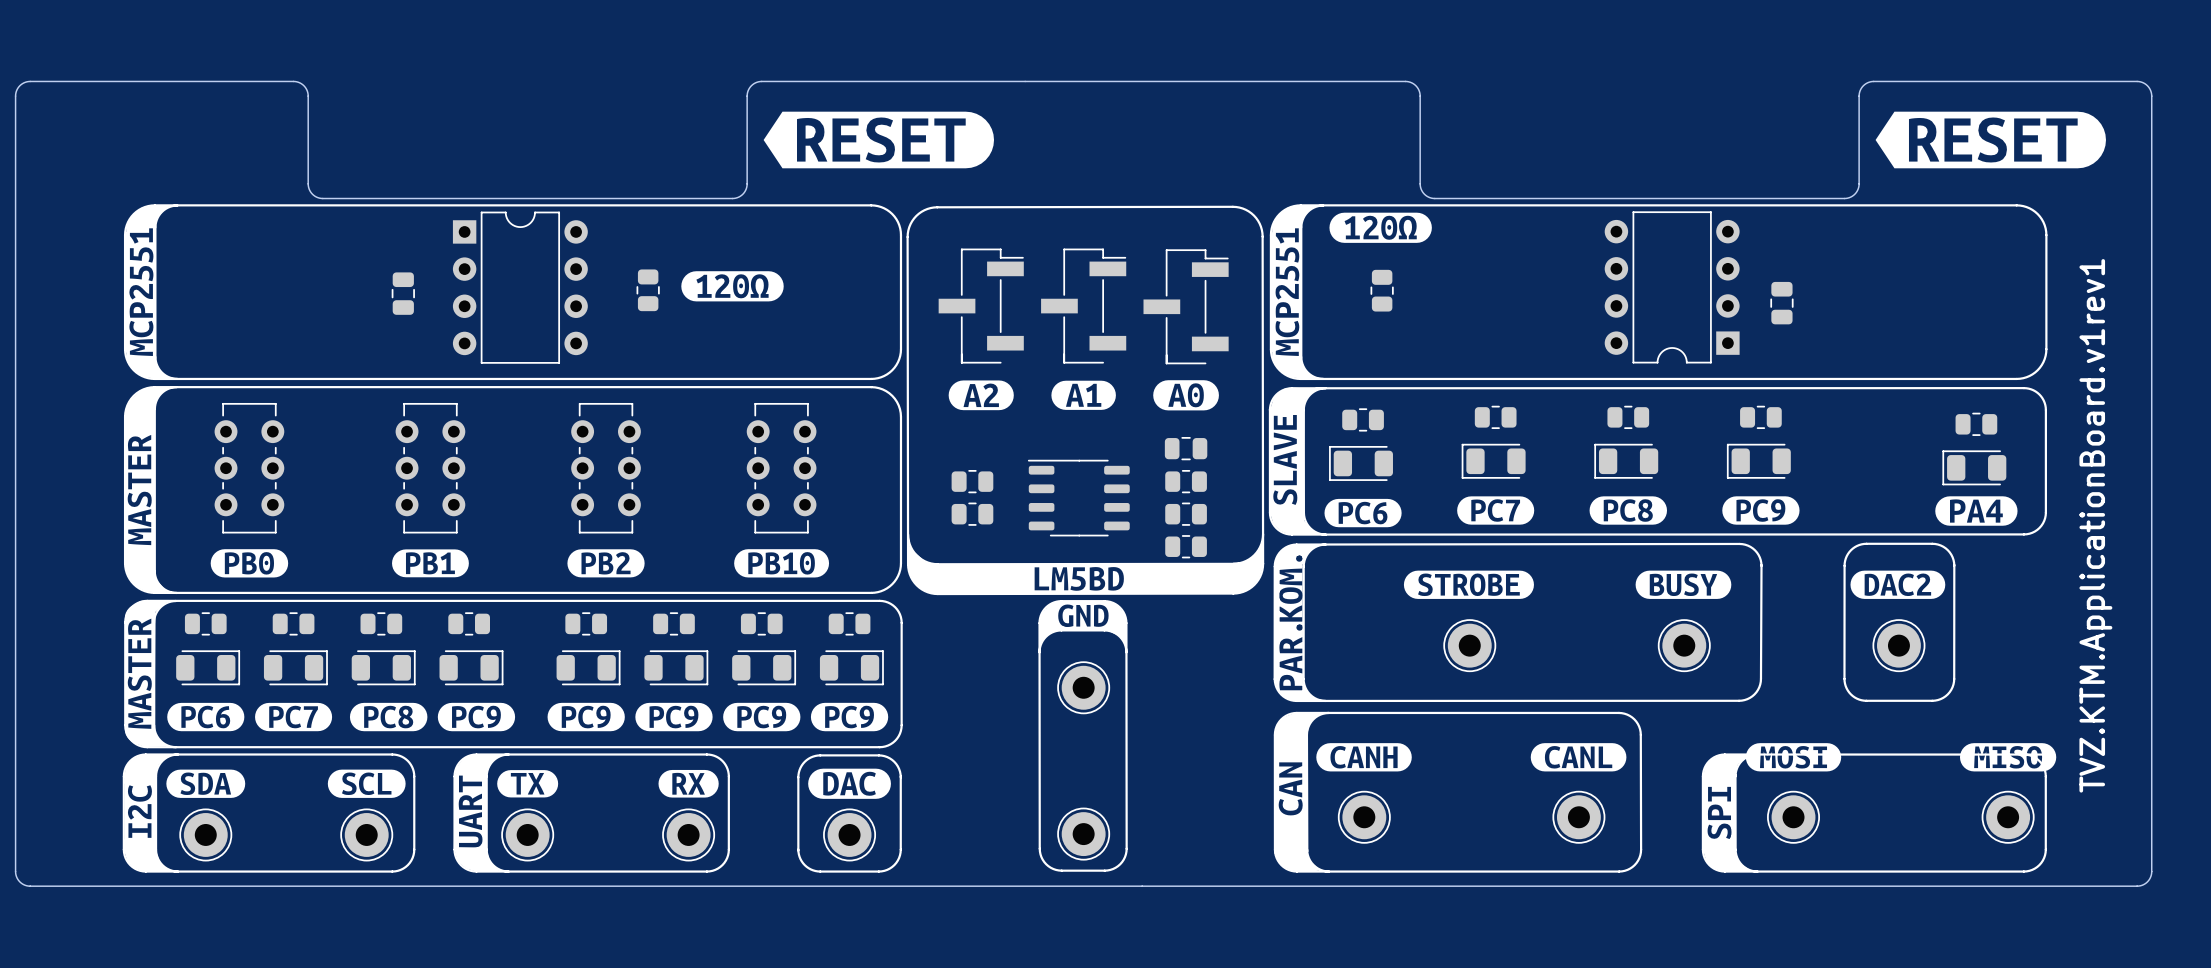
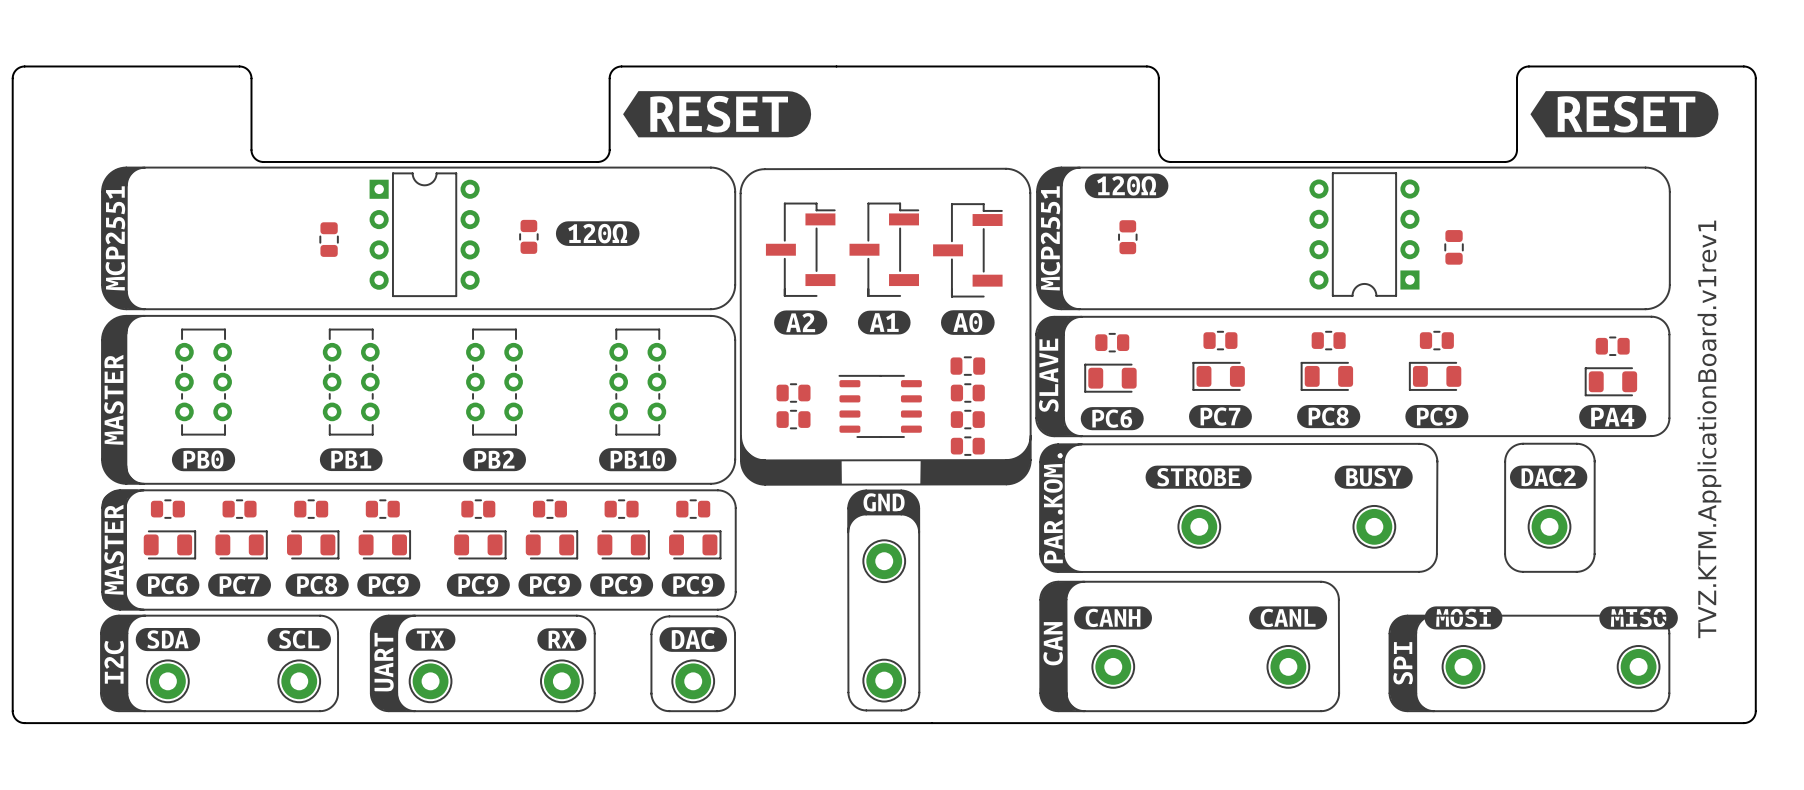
drawing: [1019, 563, 1139, 594] -> none

